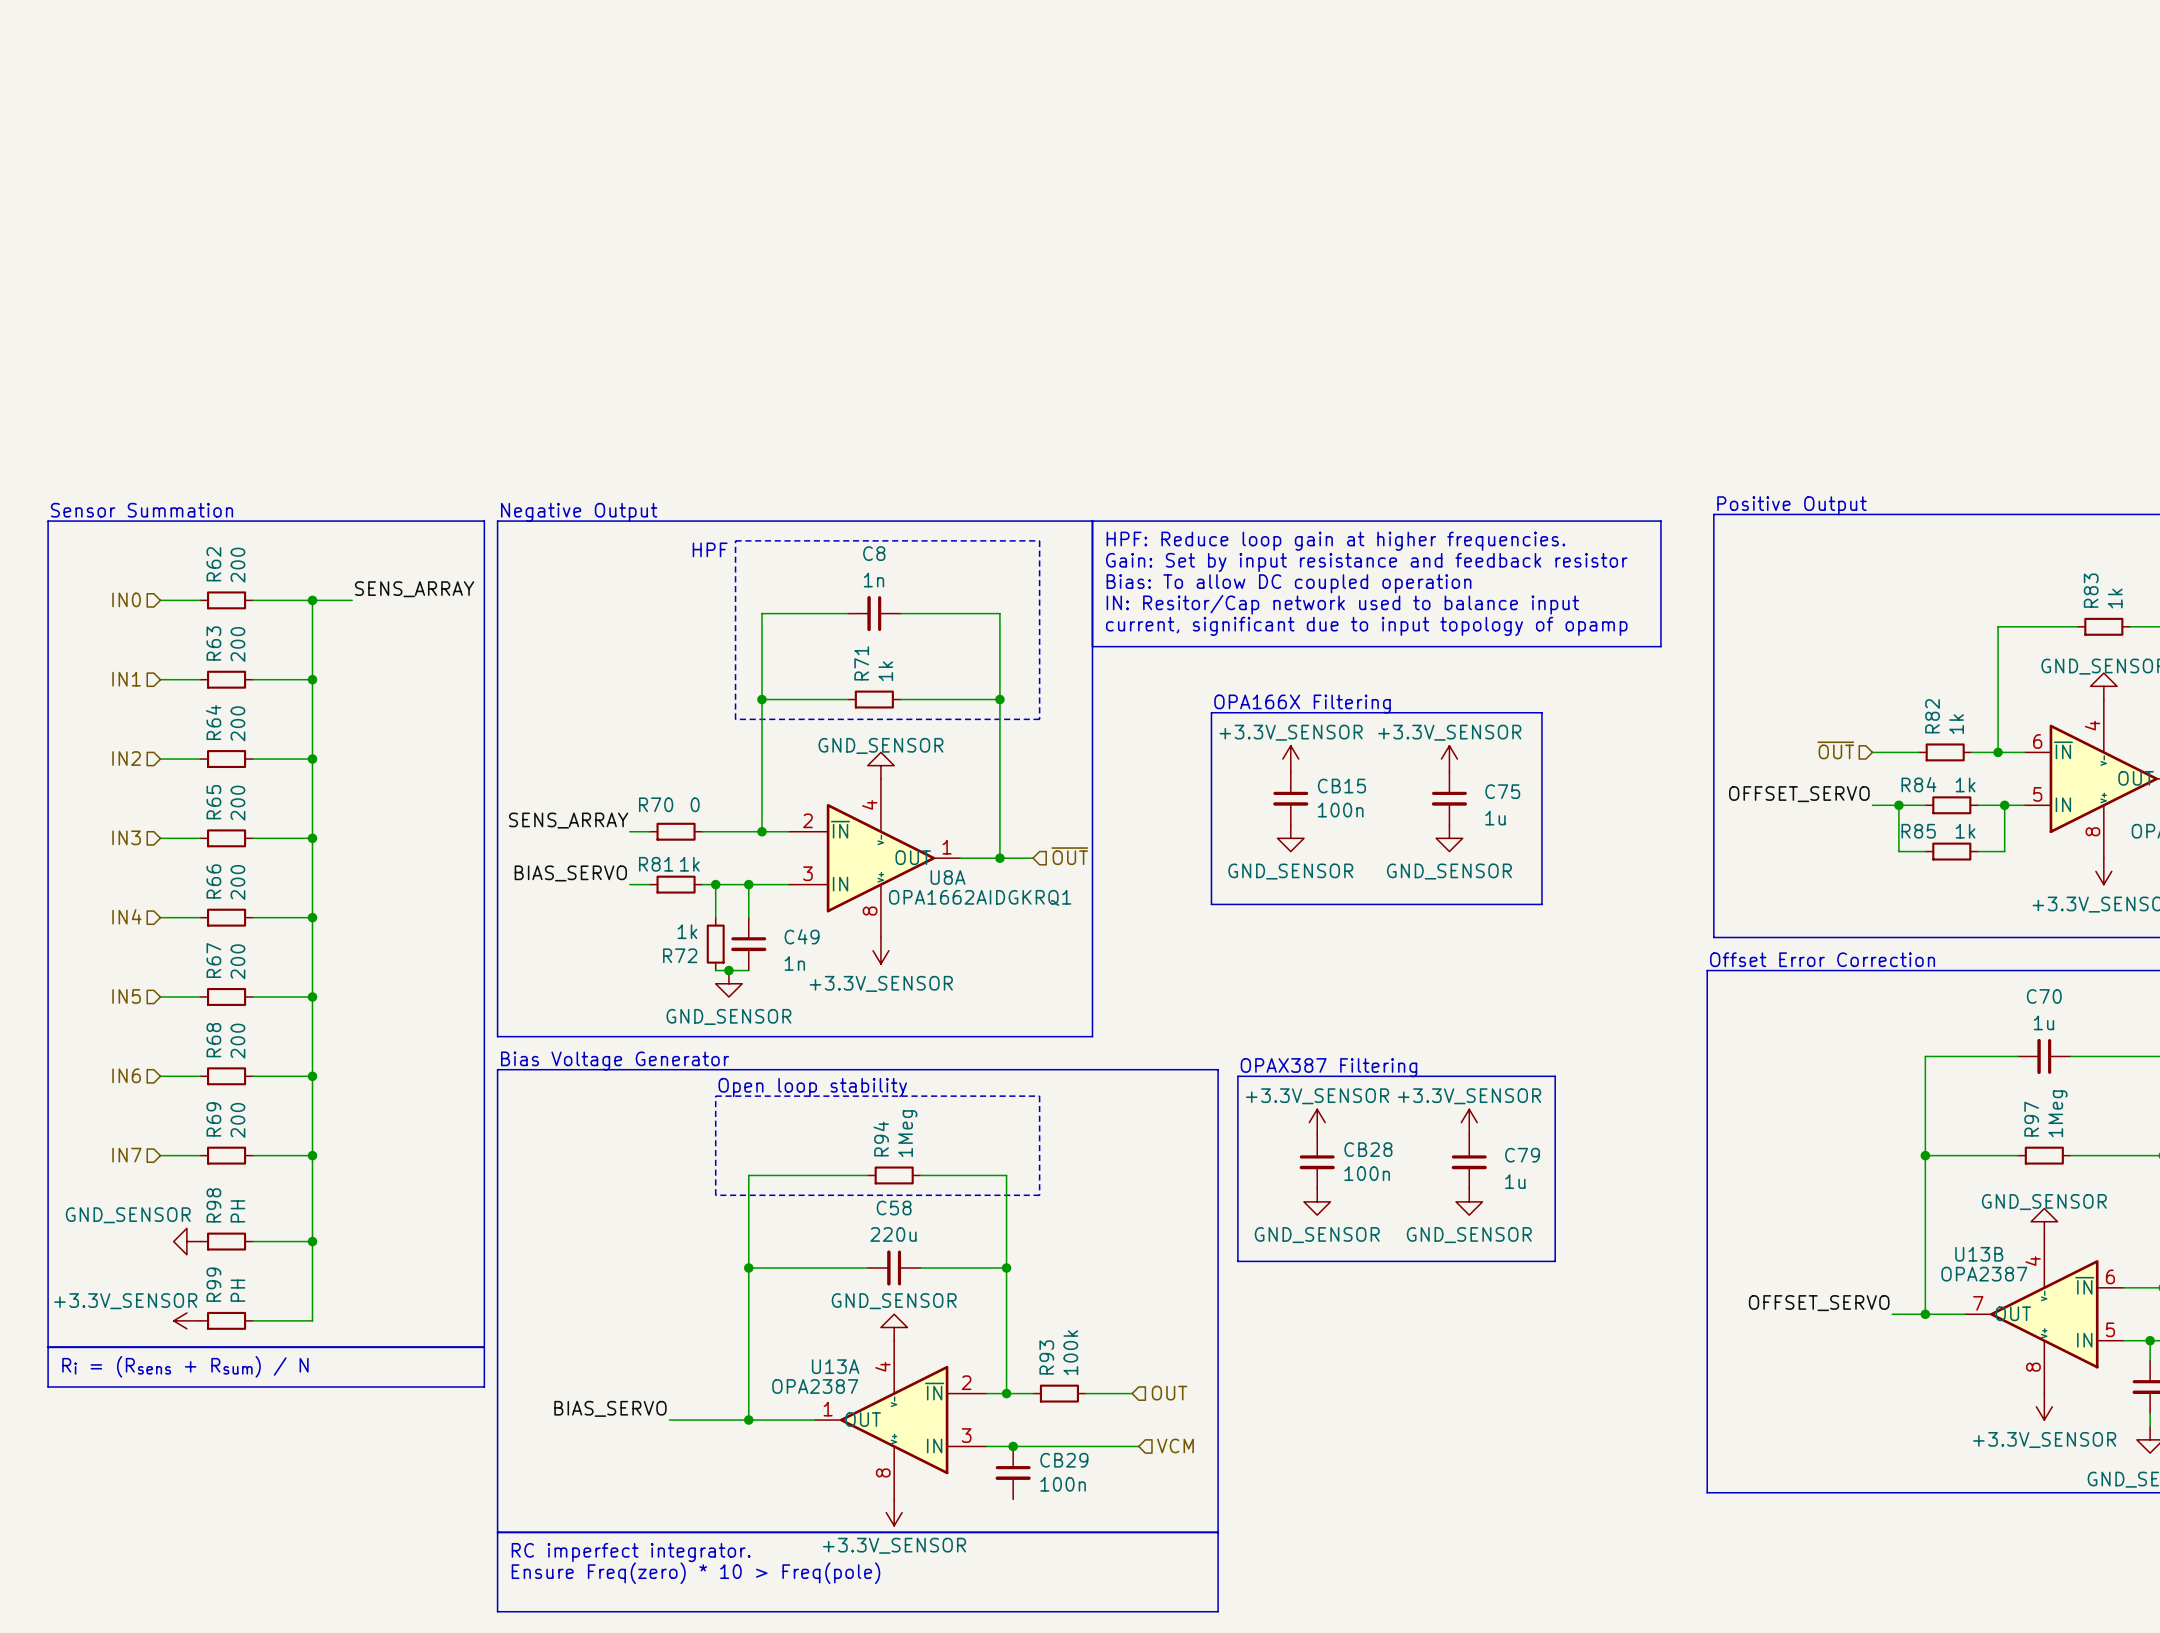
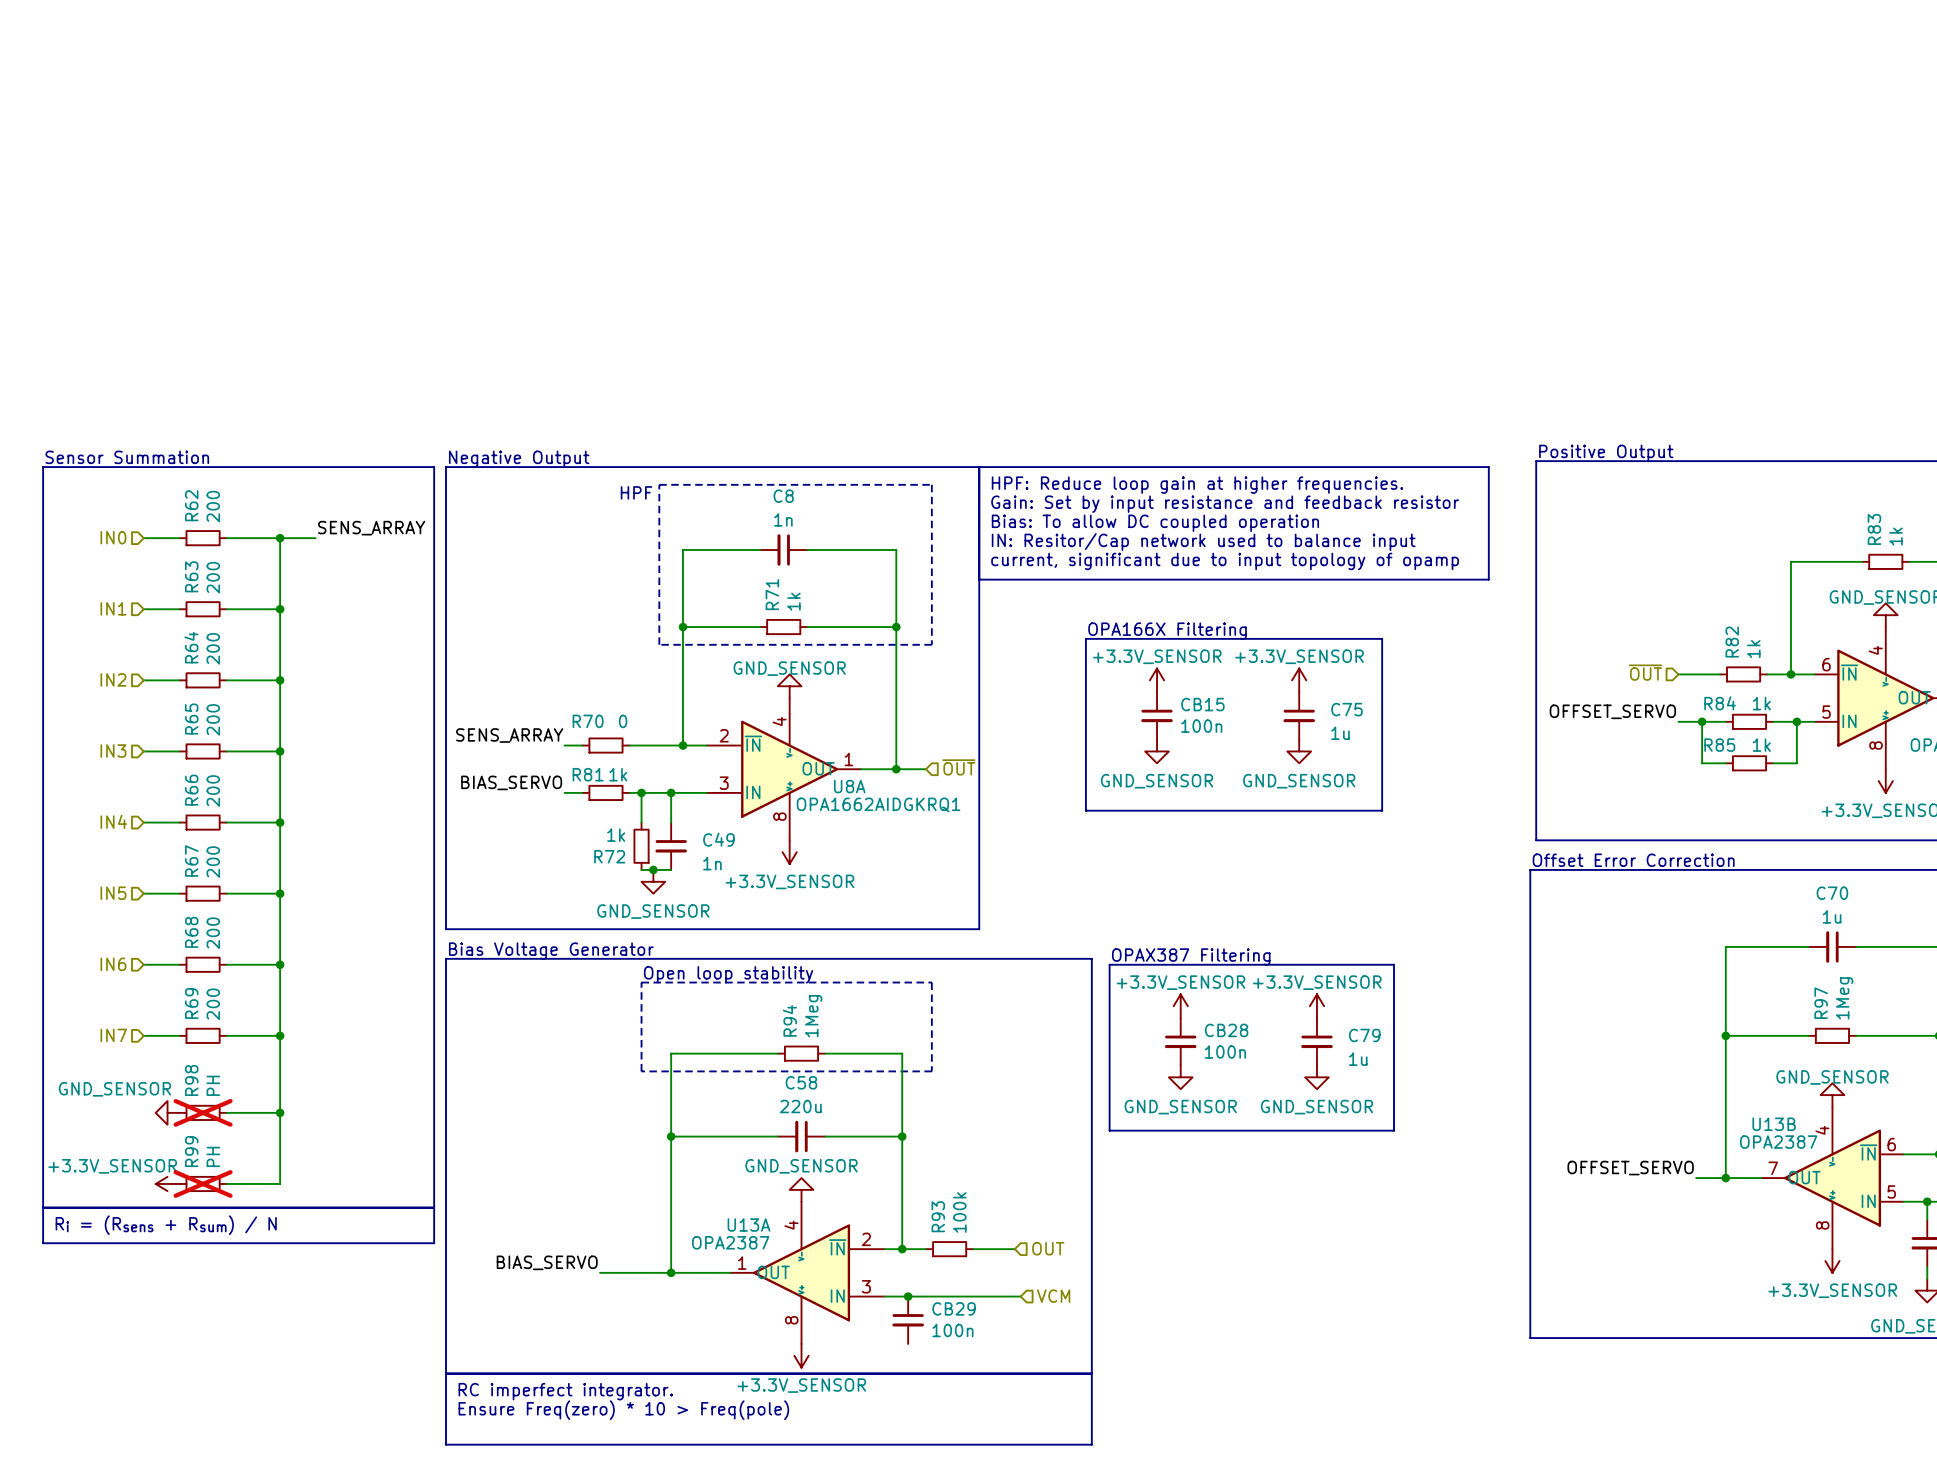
R98 do-not-place cross: none -> (203, 1112)
R99 do-not-place cross: none -> (203, 1183)

